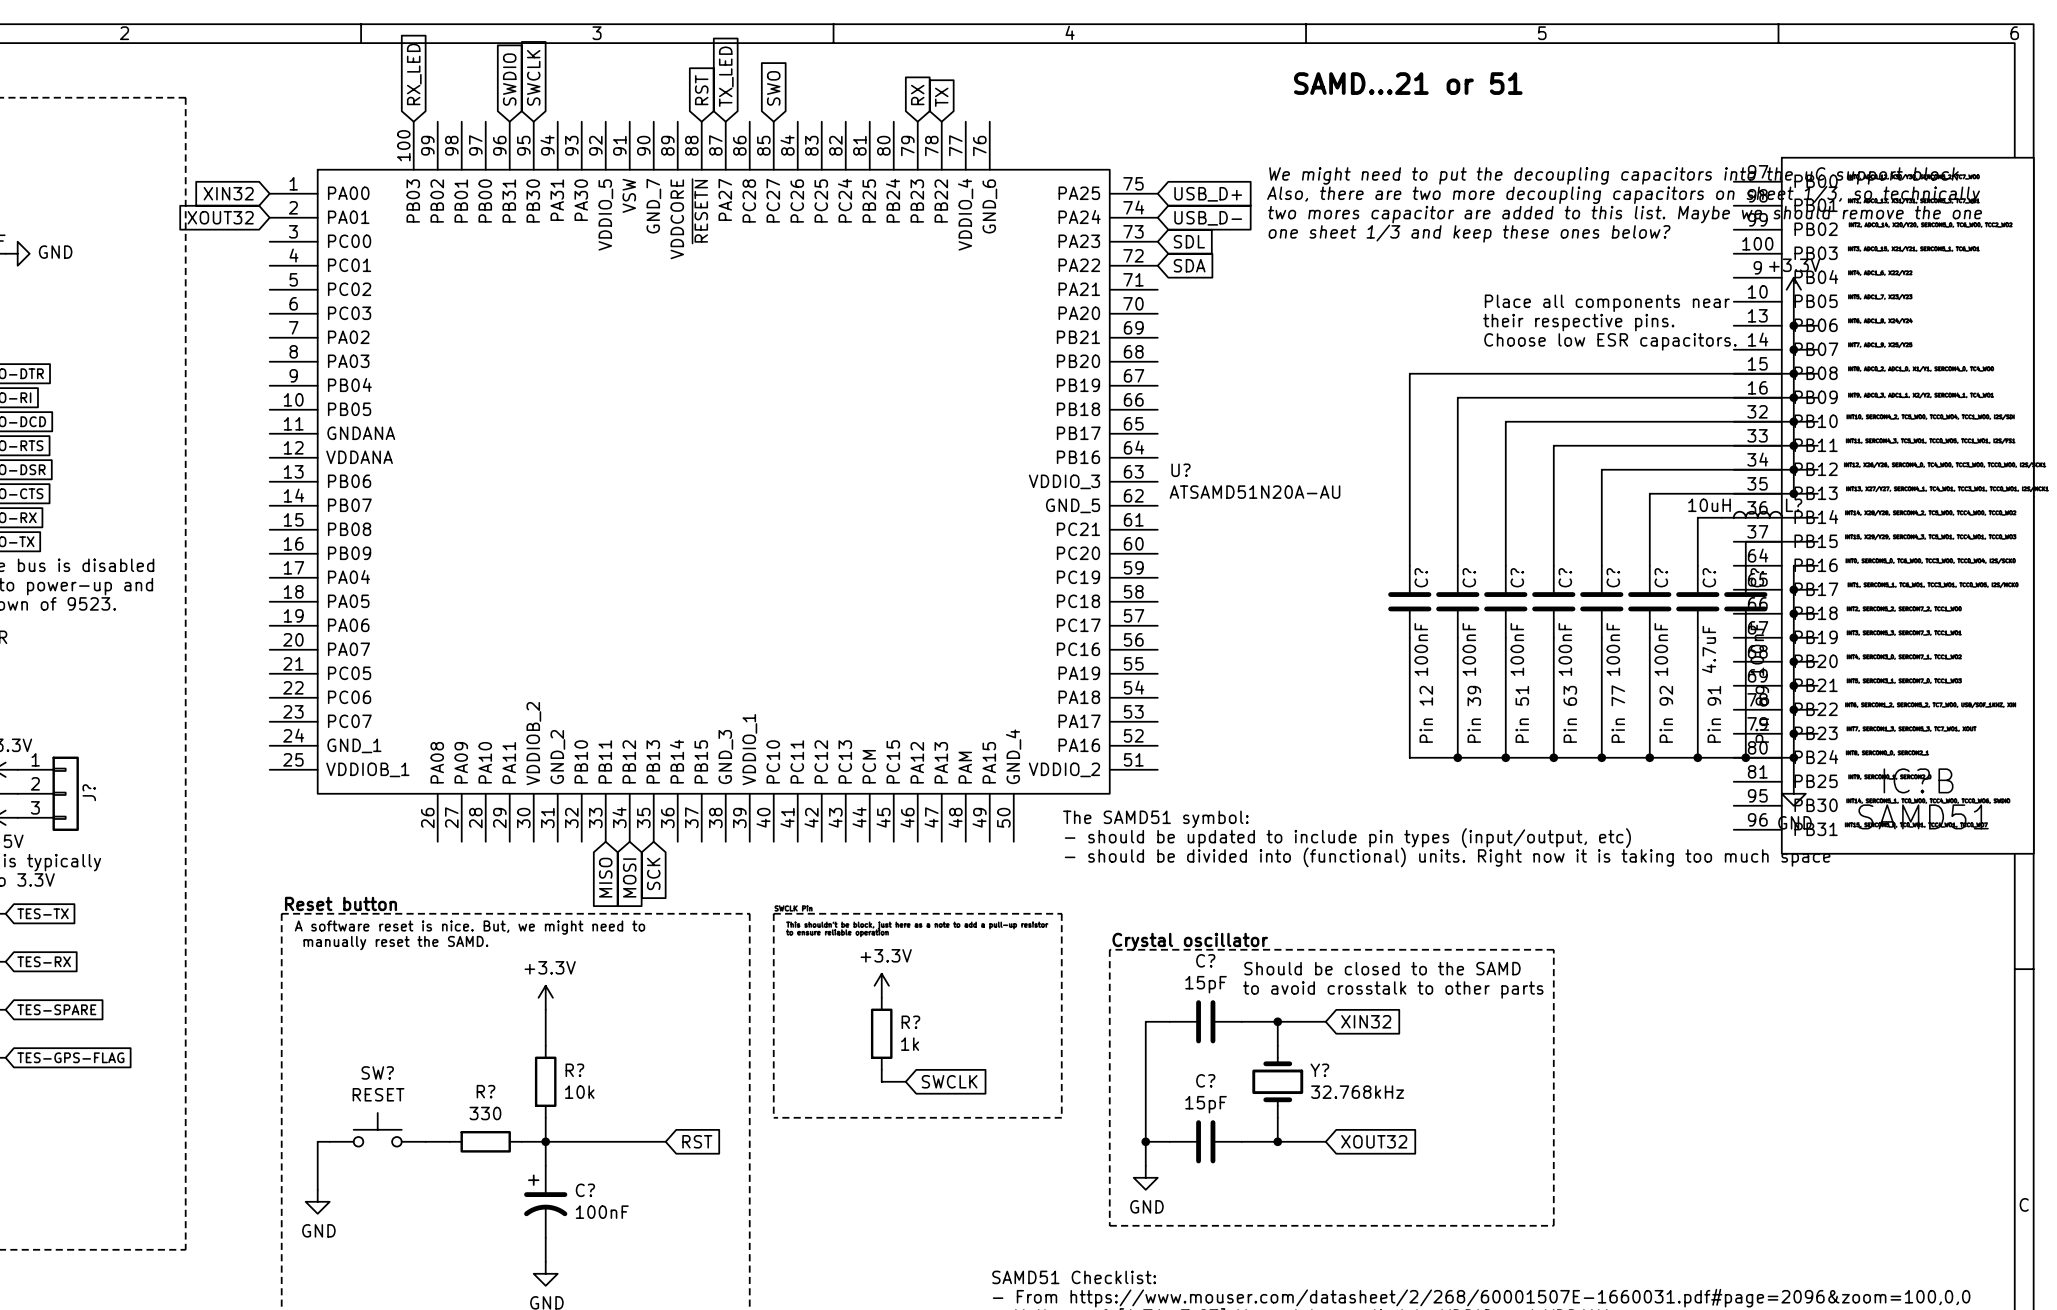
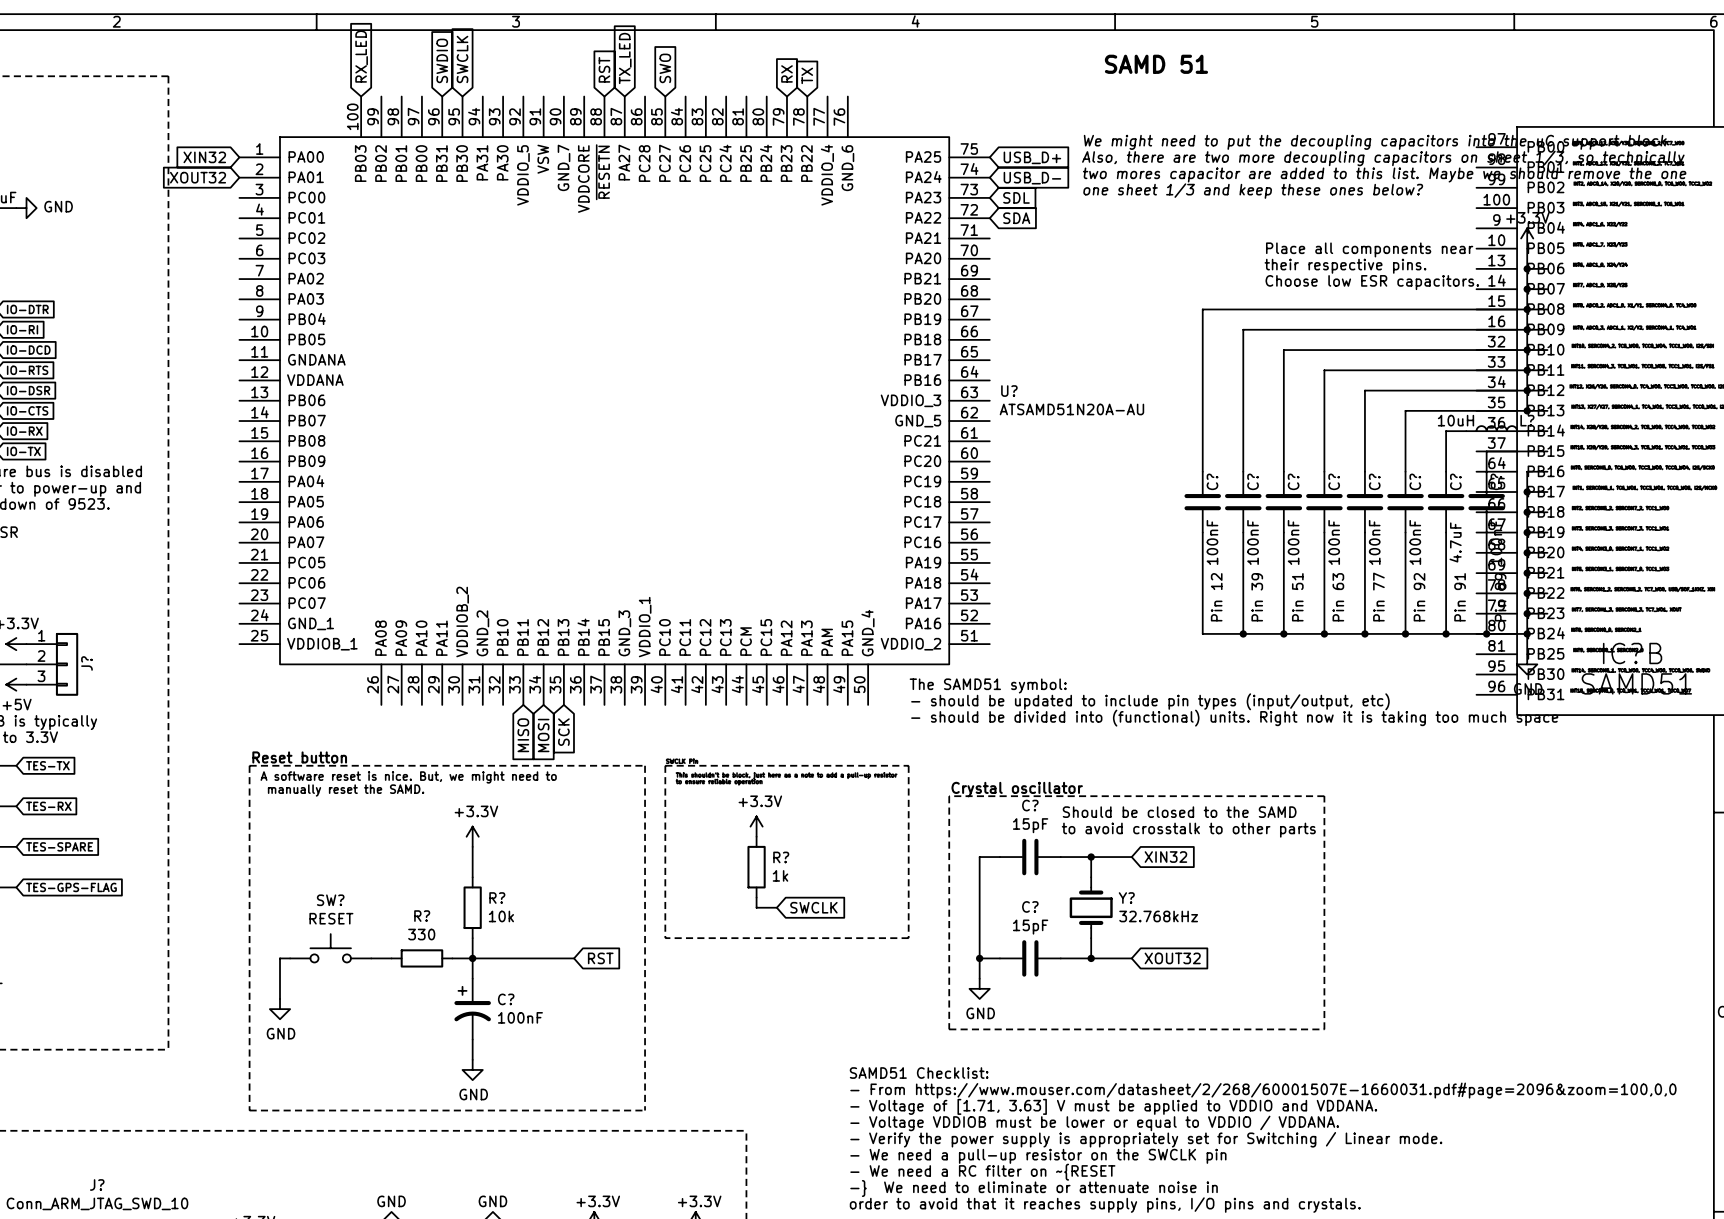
text: SAMD...21 or 51 (1408, 83) -> SAMD 51 (1156, 64)

